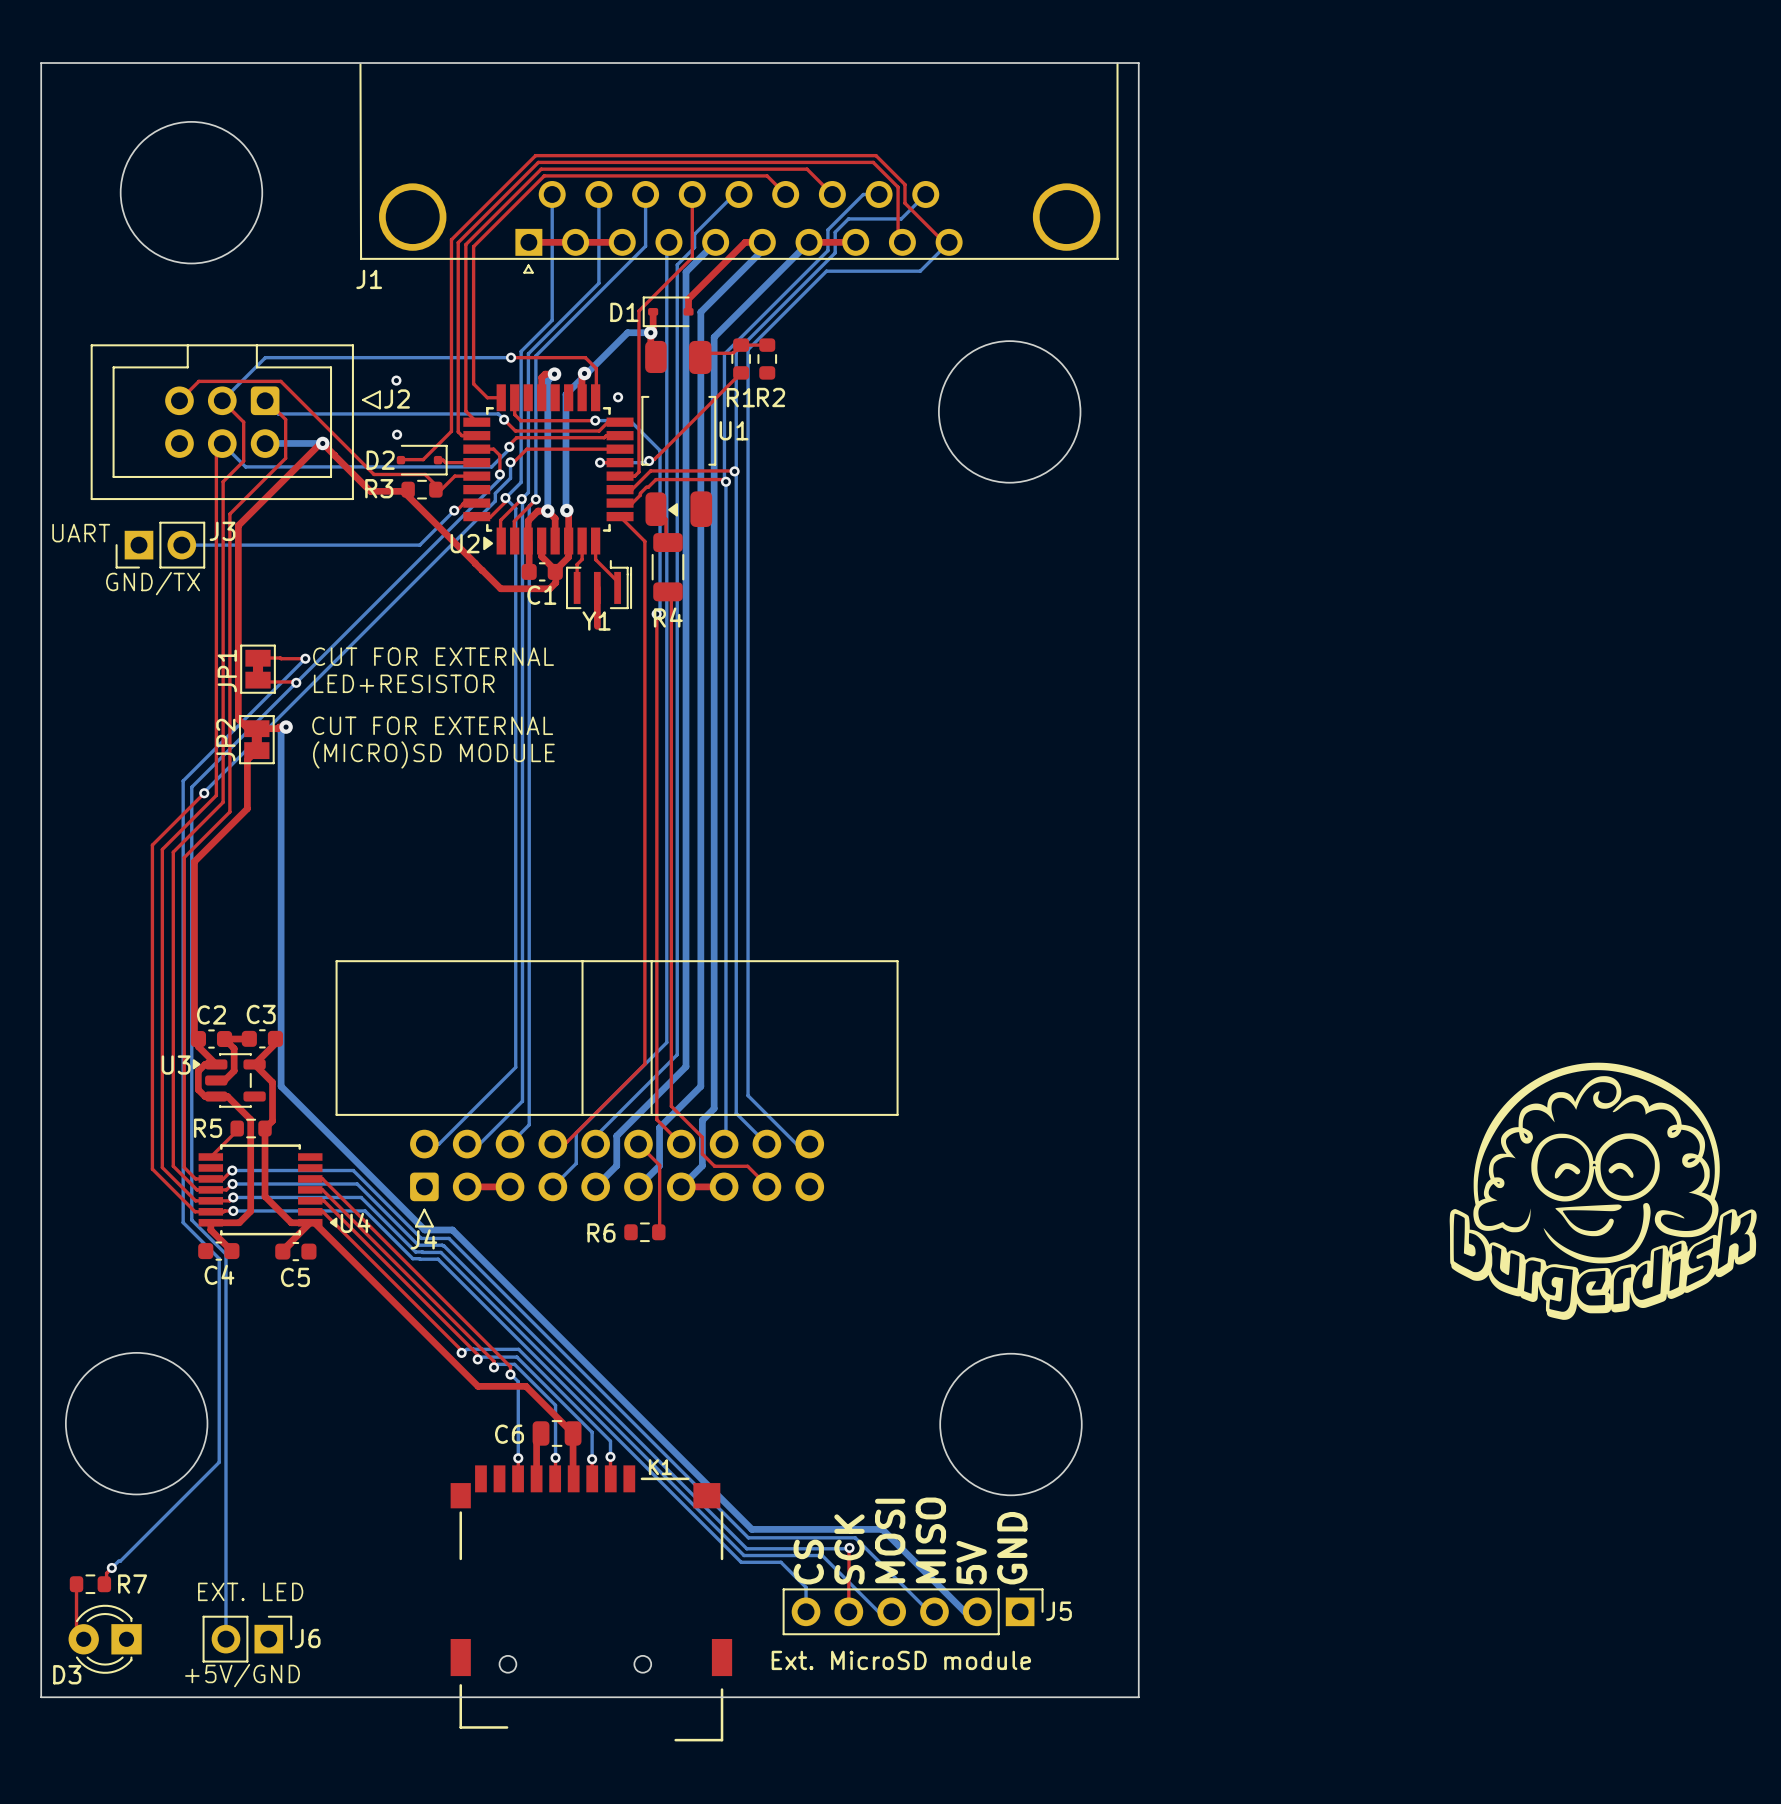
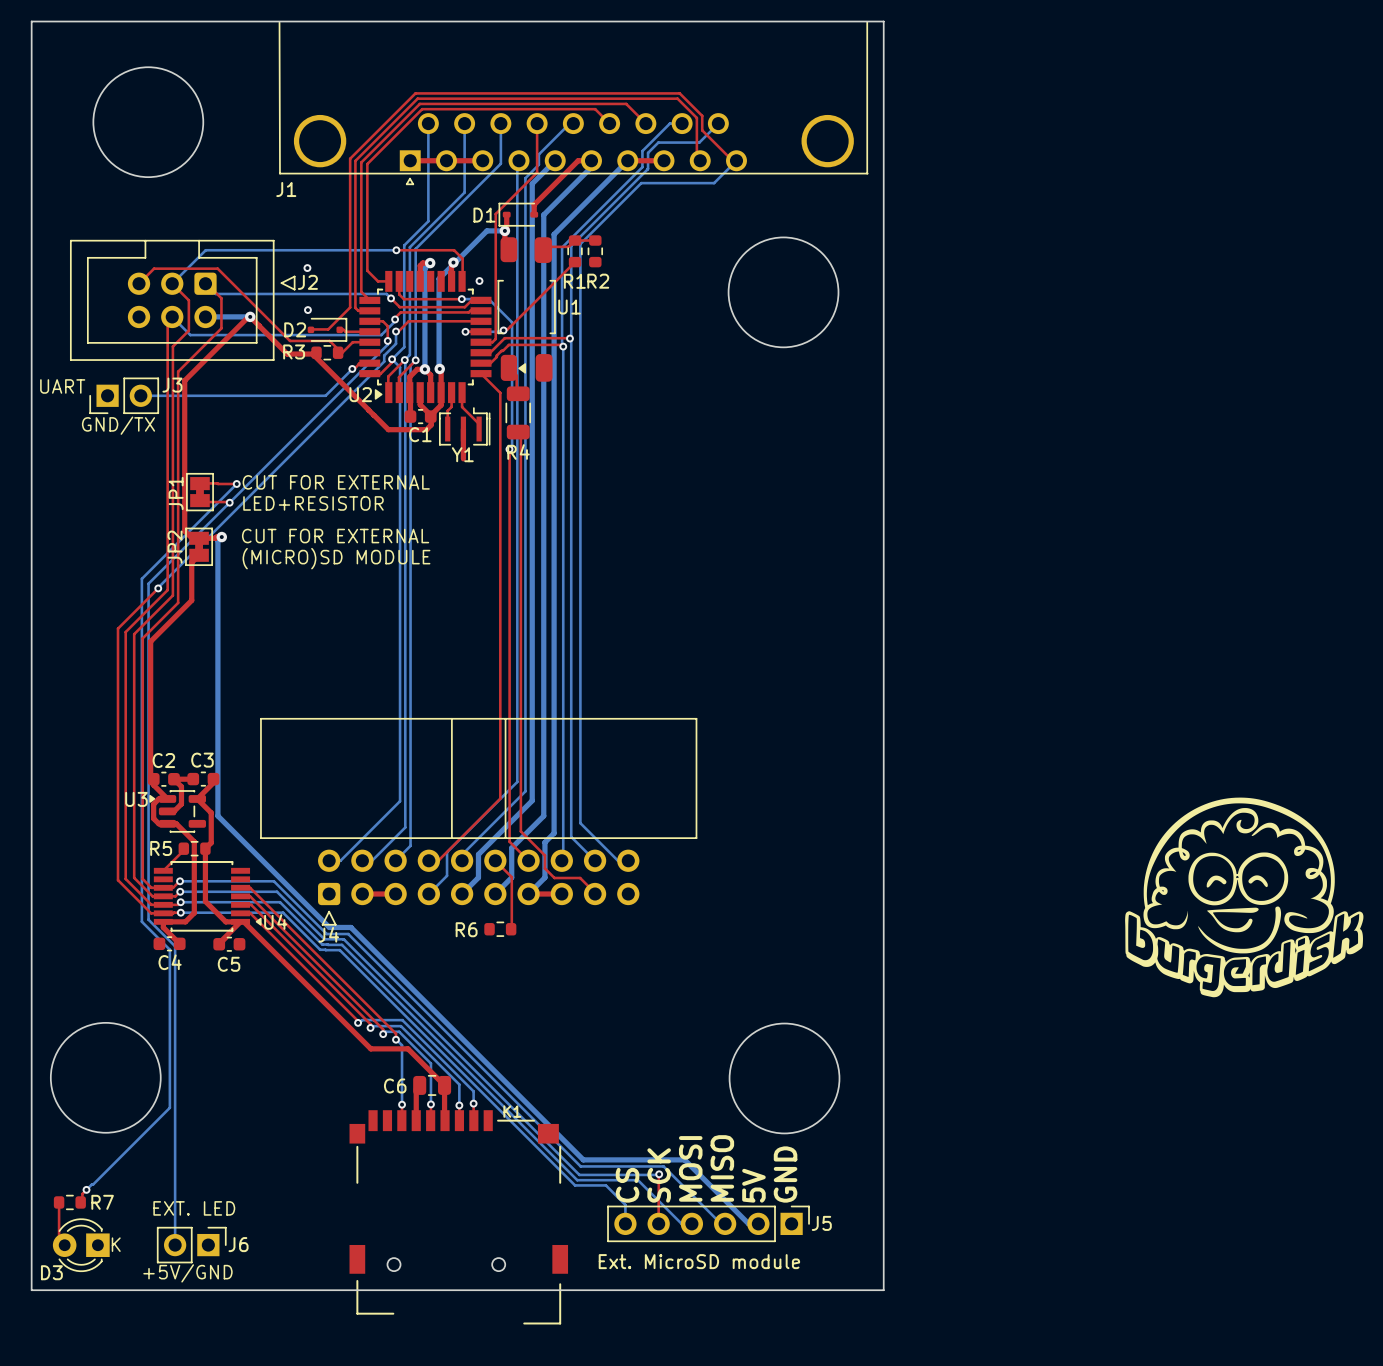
D3 text: none -> K (116, 1244)

